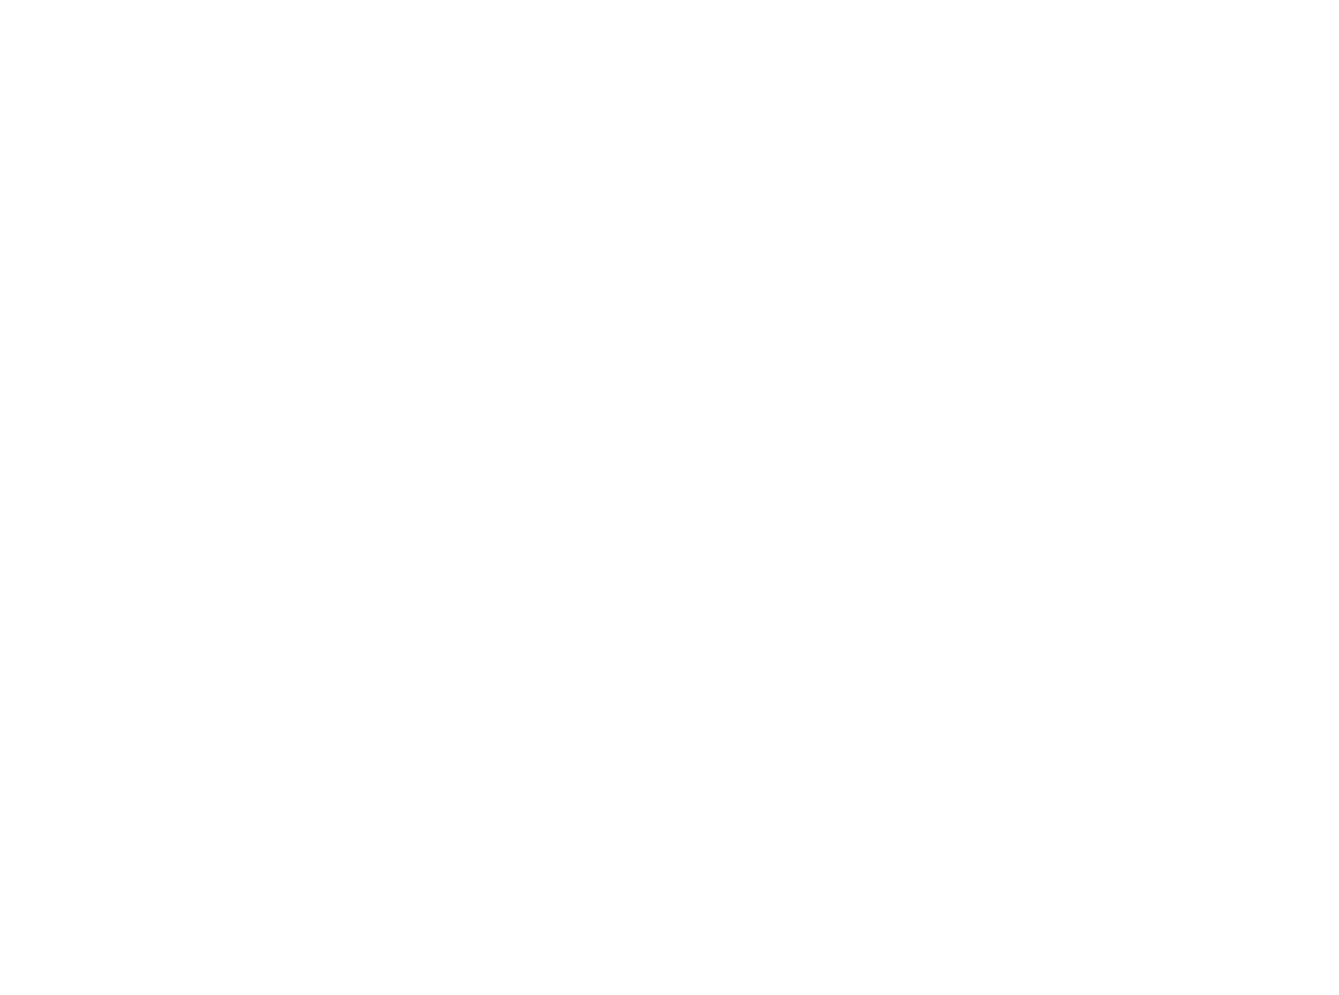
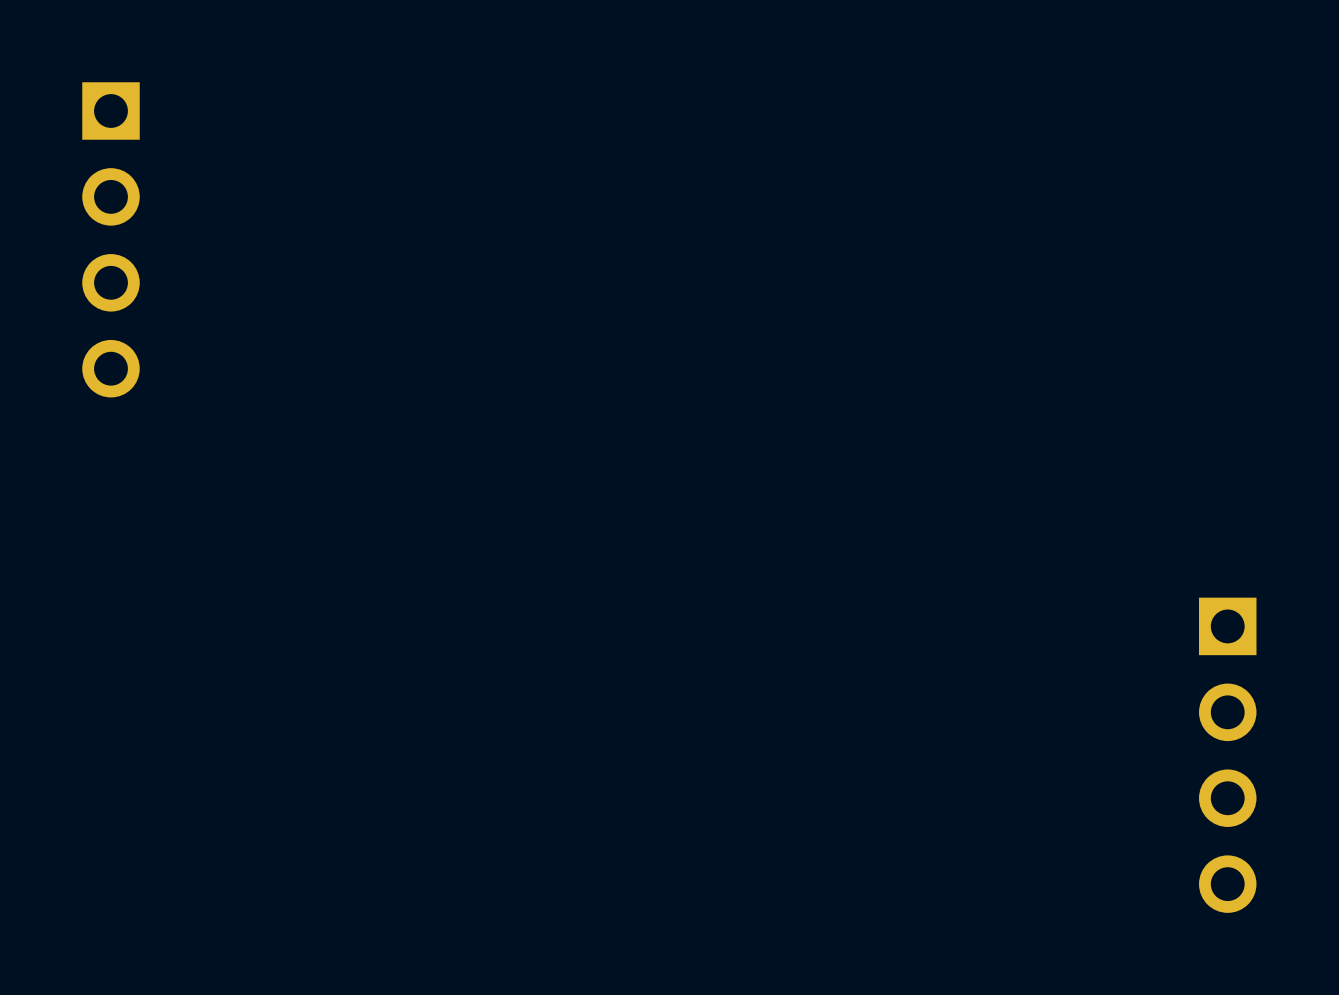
part: none -> (111, 239)
part: none -> (1227, 755)

